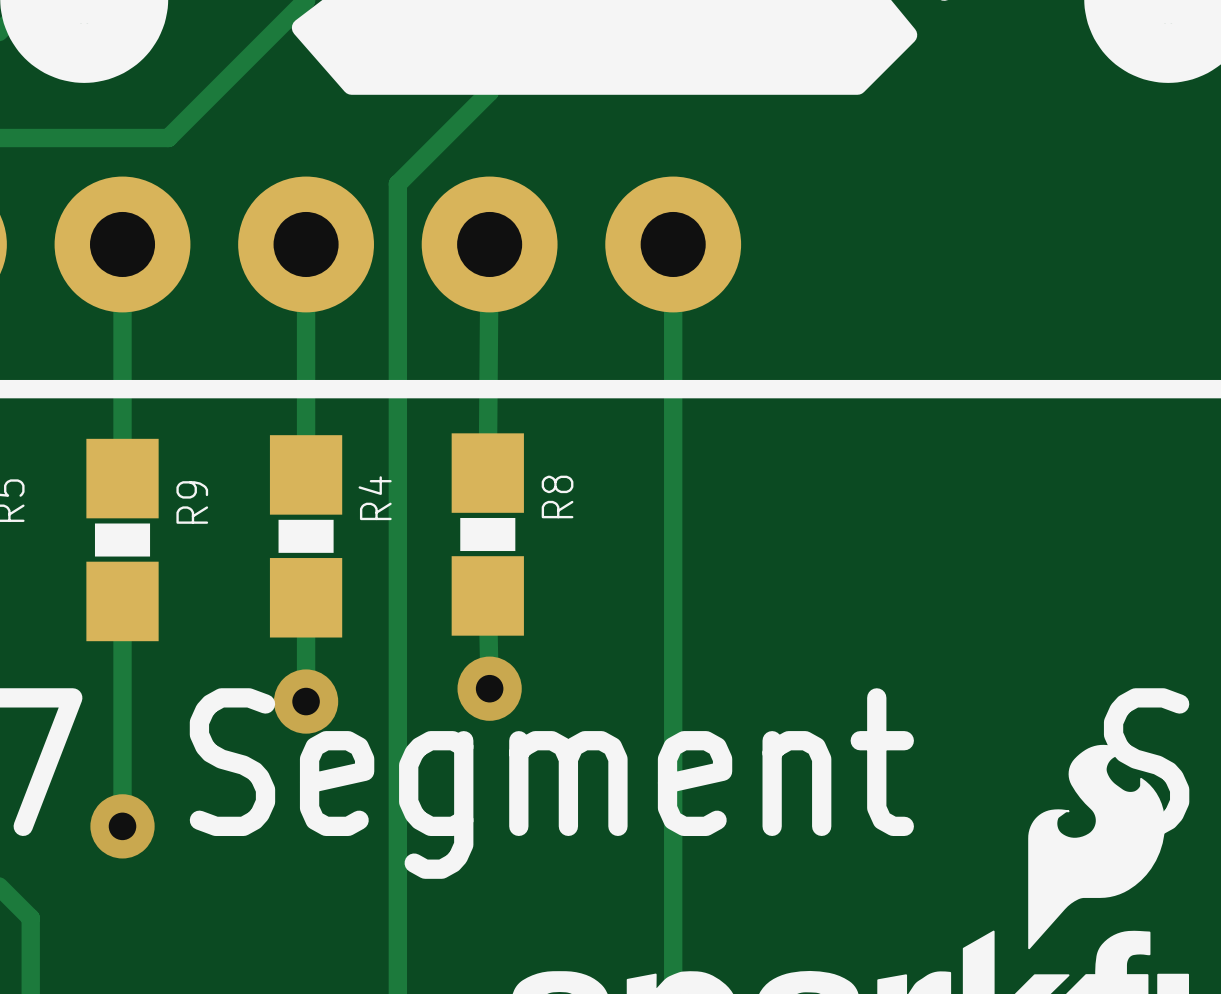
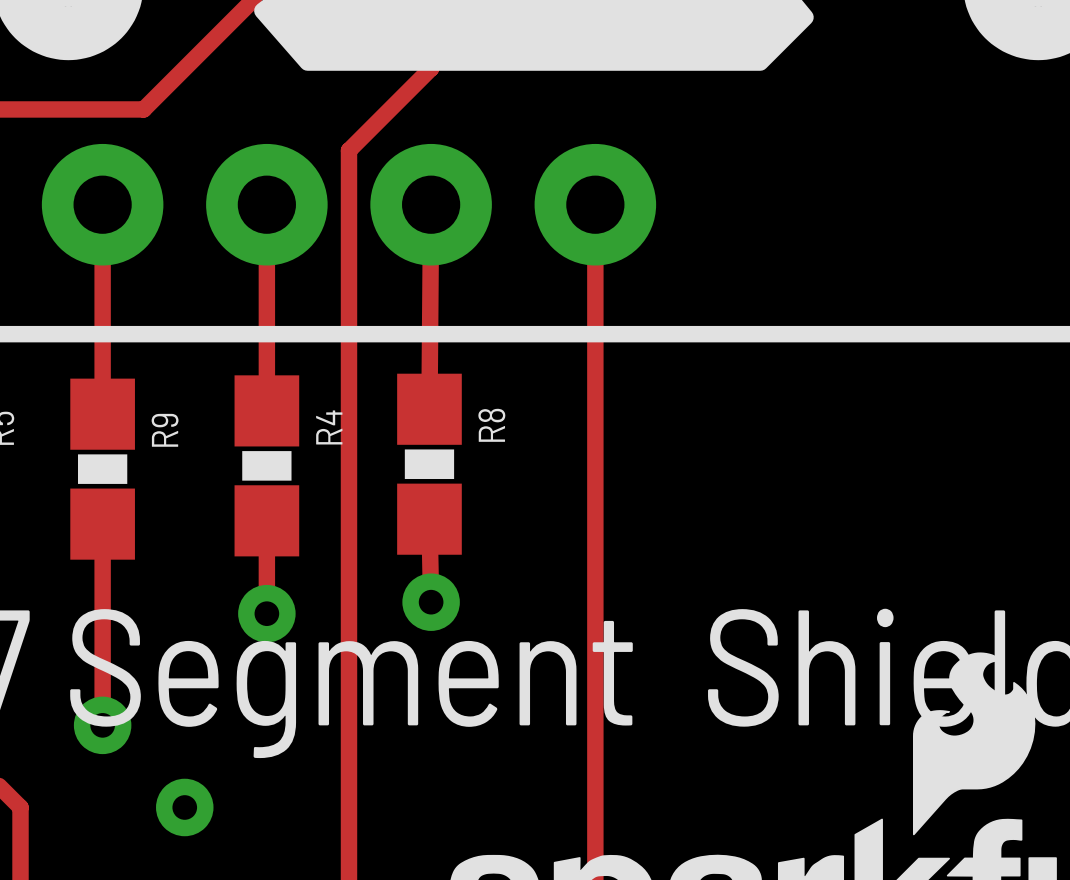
via: none -> (184, 807)

